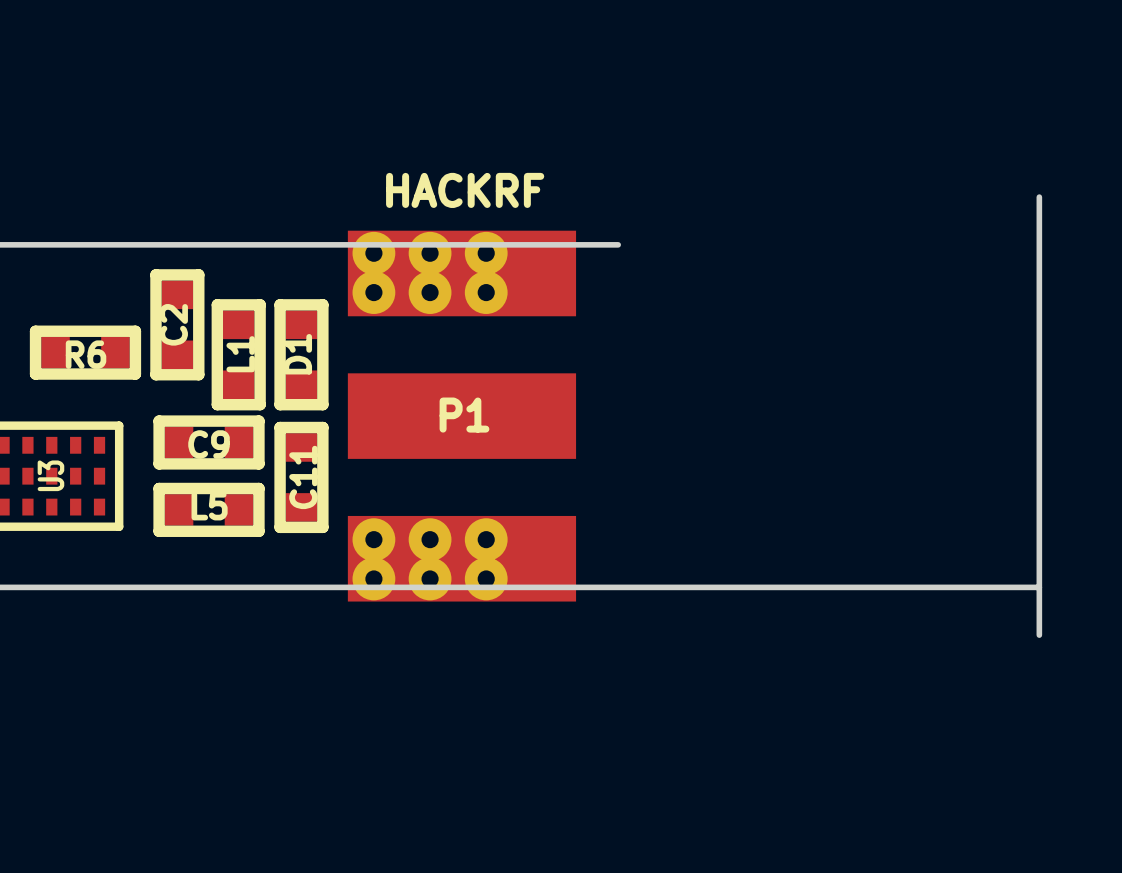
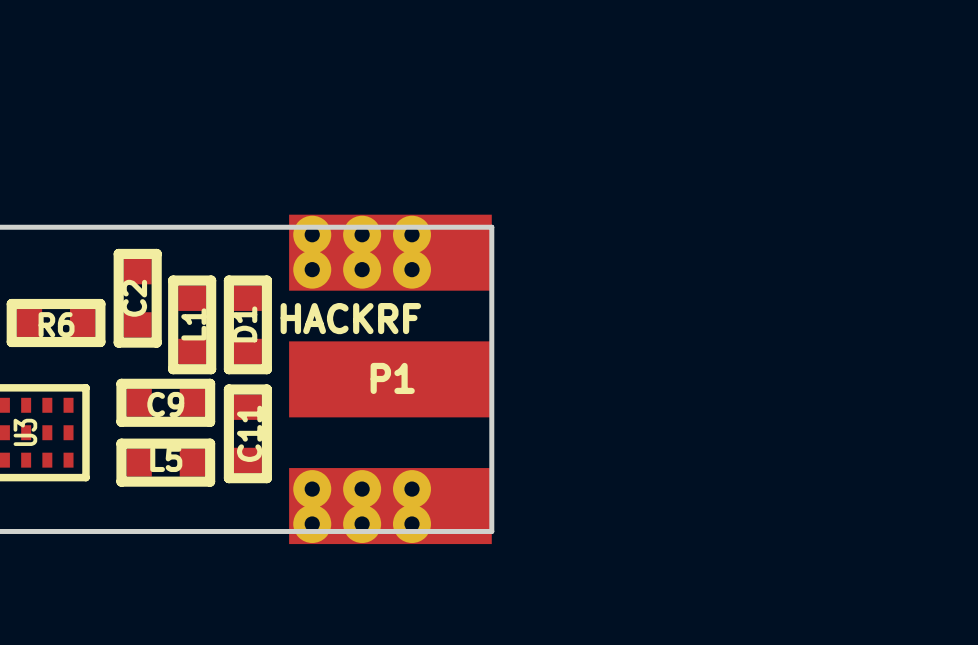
P1 value position: HACKRF (465, 190) -> HACKRF (350, 318)
board edge: (1039, 197) (1039, 635) -> none
board edge: (576, 244) (618, 244) -> (491, 227) (491, 531)
board edge: (576, 587) (1039, 587) -> none

